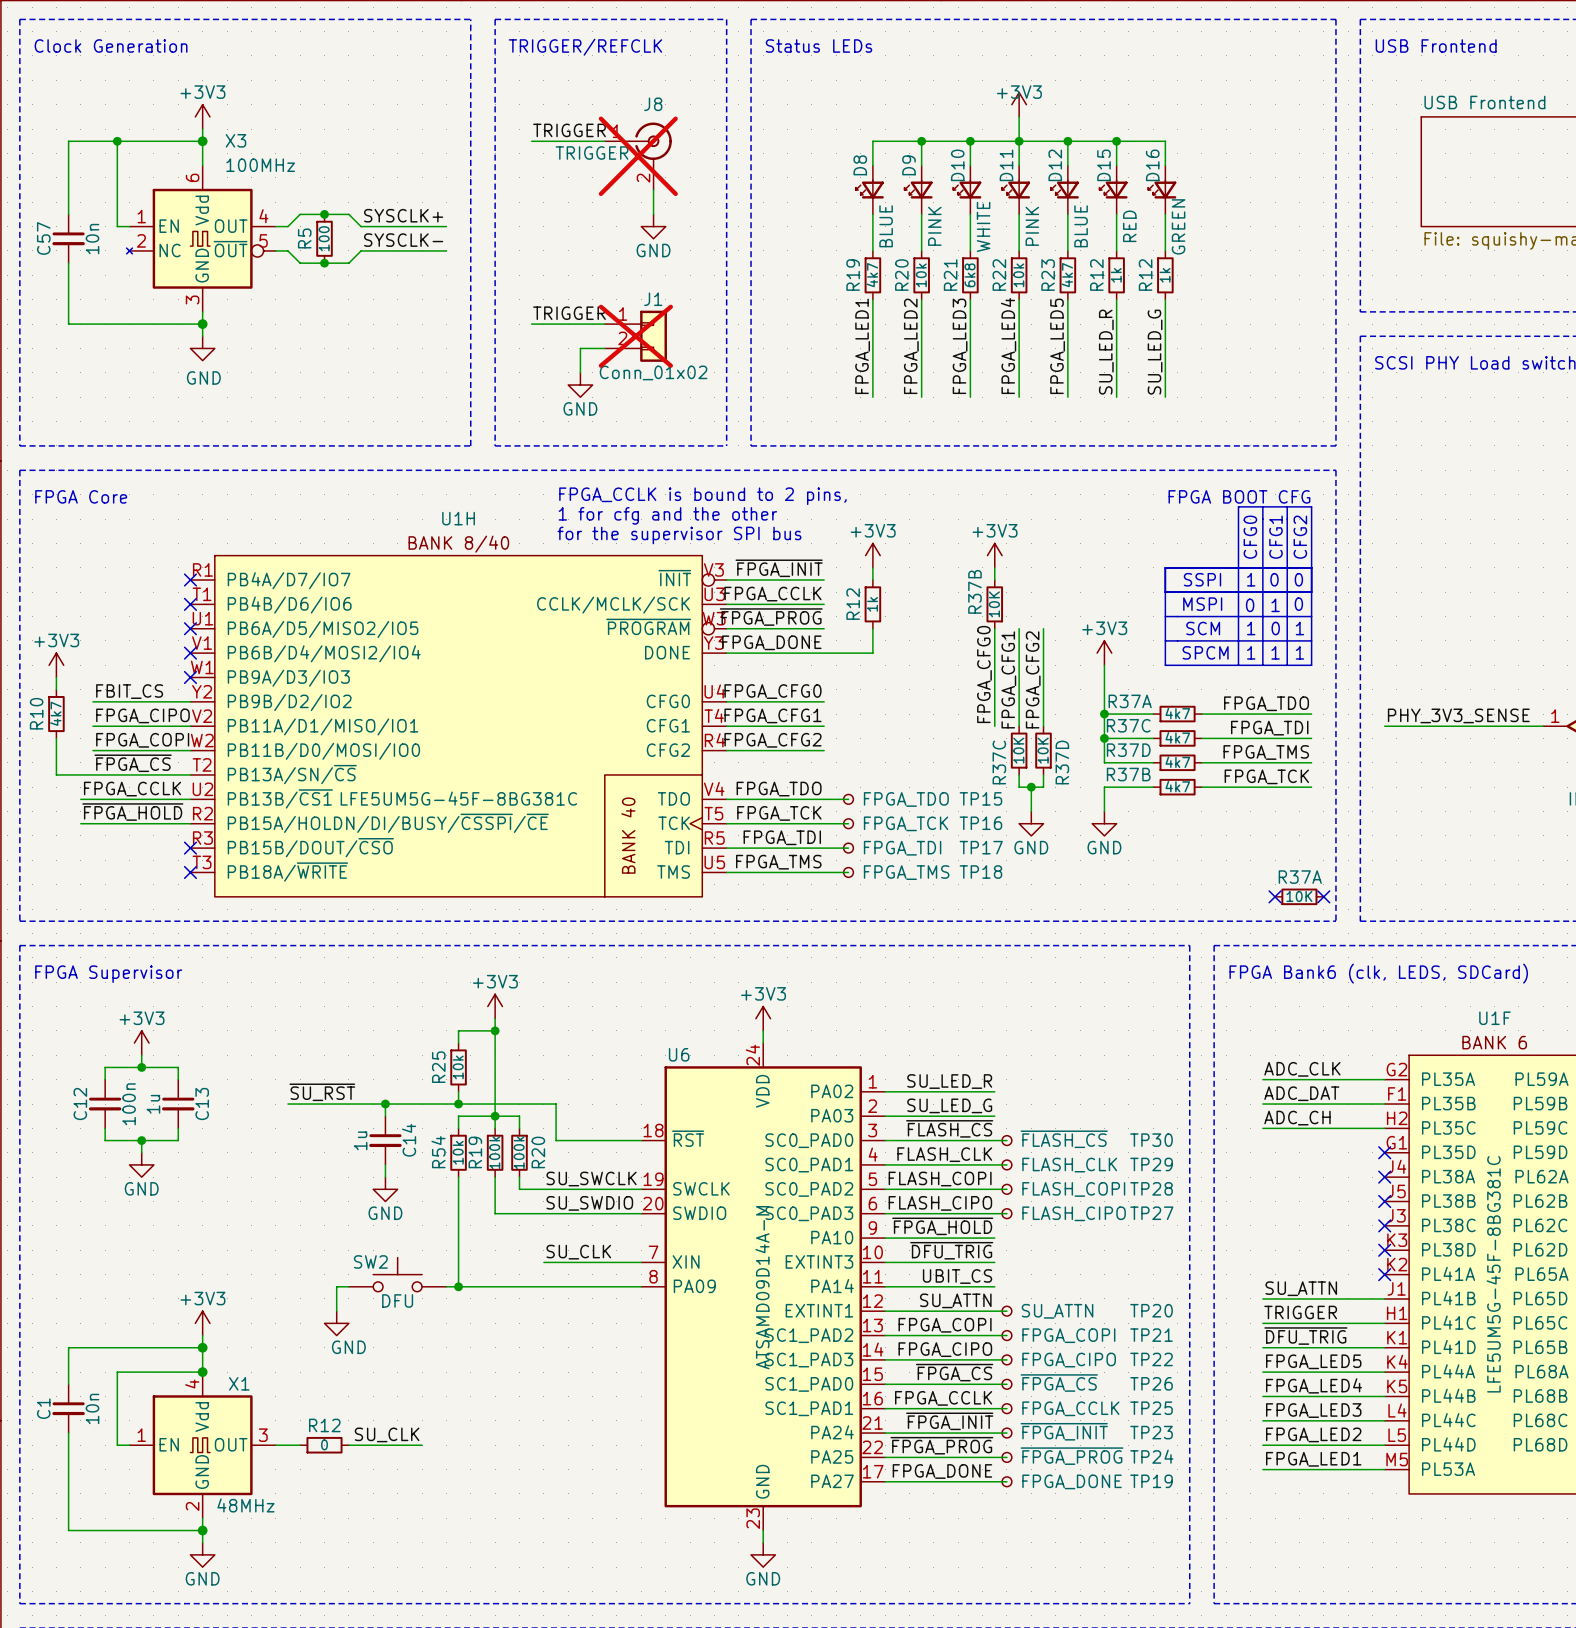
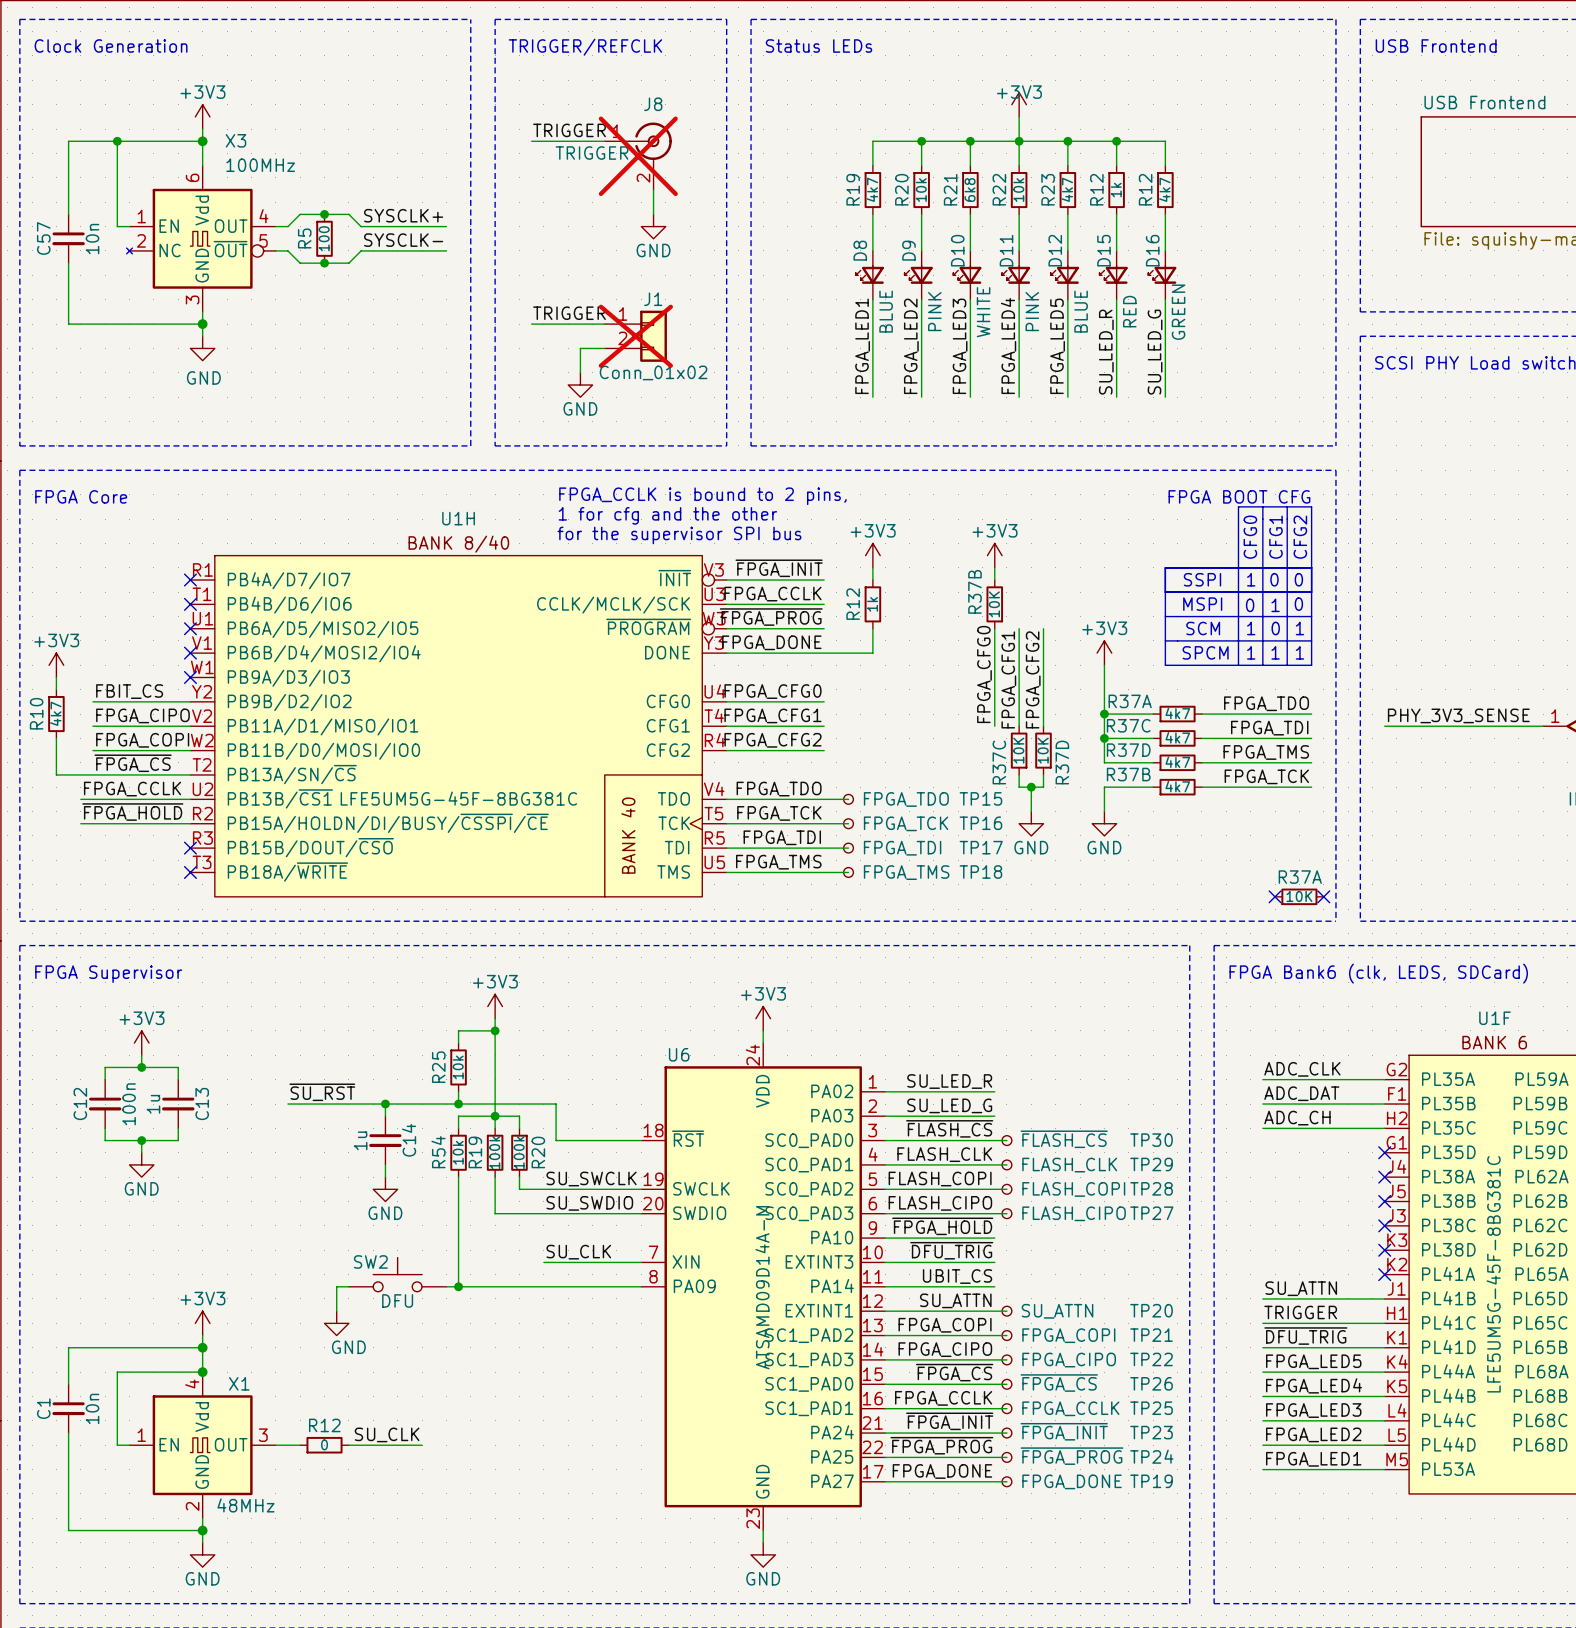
D8 position: (869, 190) -> (869, 275)
D9 position: (918, 190) -> (918, 275)
D10 position: (967, 190) -> (967, 275)
D11 position: (1016, 190) -> (1016, 275)
D12 position: (1064, 190) -> (1064, 275)
D15 position: (1113, 190) -> (1113, 275)
R12: none -> 1k (1116, 190)
D16 position: (1162, 190) -> (1162, 275)
R12: none -> 4k7 (1165, 190)
R19 position: (872, 275) -> (872, 190)
R20 position: (921, 275) -> (921, 190)
R21 position: (970, 275) -> (970, 190)
R22 position: (1019, 275) -> (1019, 190)
R23 position: (1067, 275) -> (1067, 190)
R12: 1k (1116, 275) -> none
R12: 1k (1165, 275) -> none

